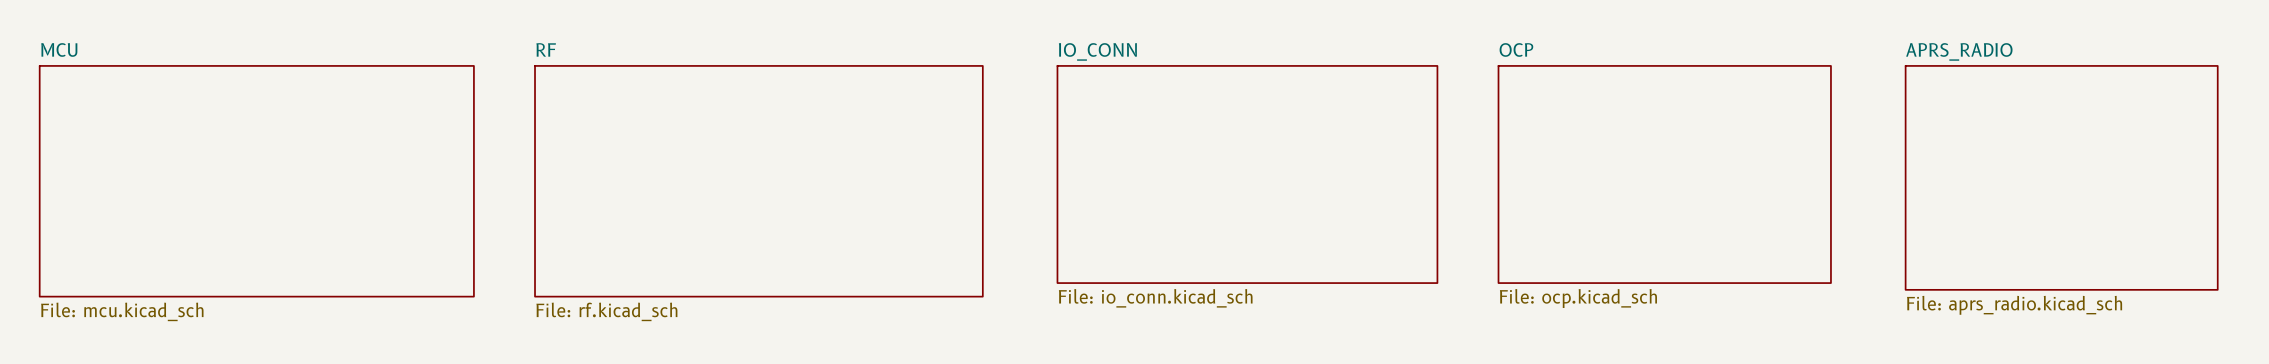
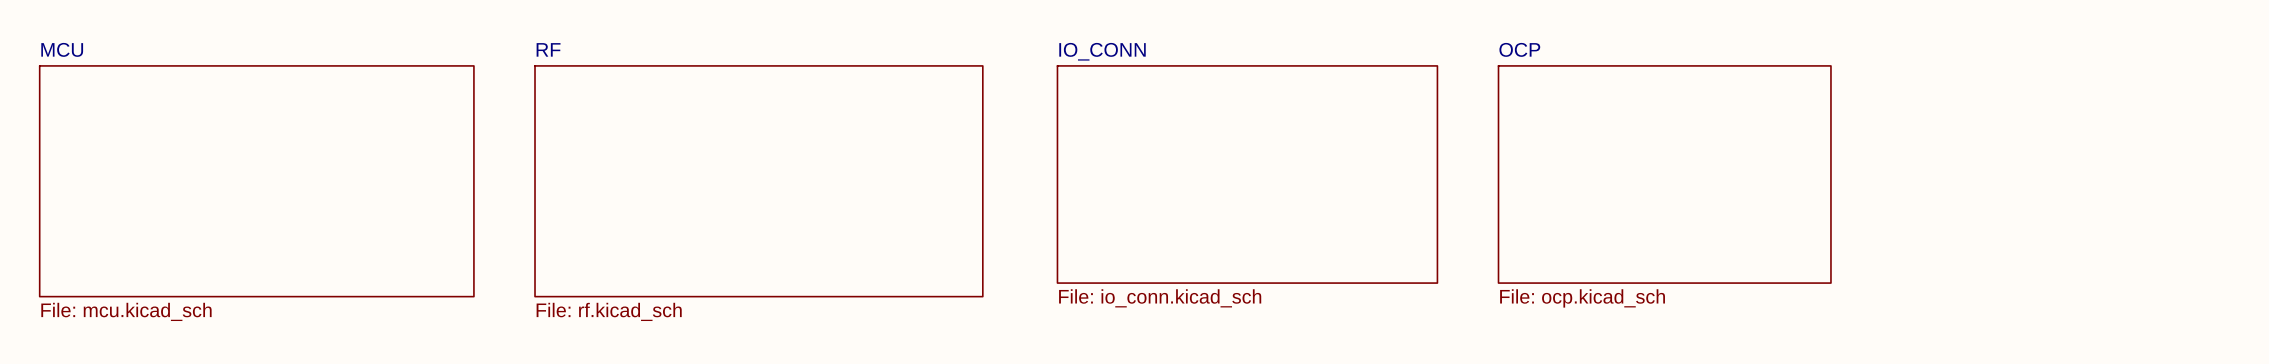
sheet APRS_RADIO: File: aprs_radio.kicad_sch (2061, 177) -> none

